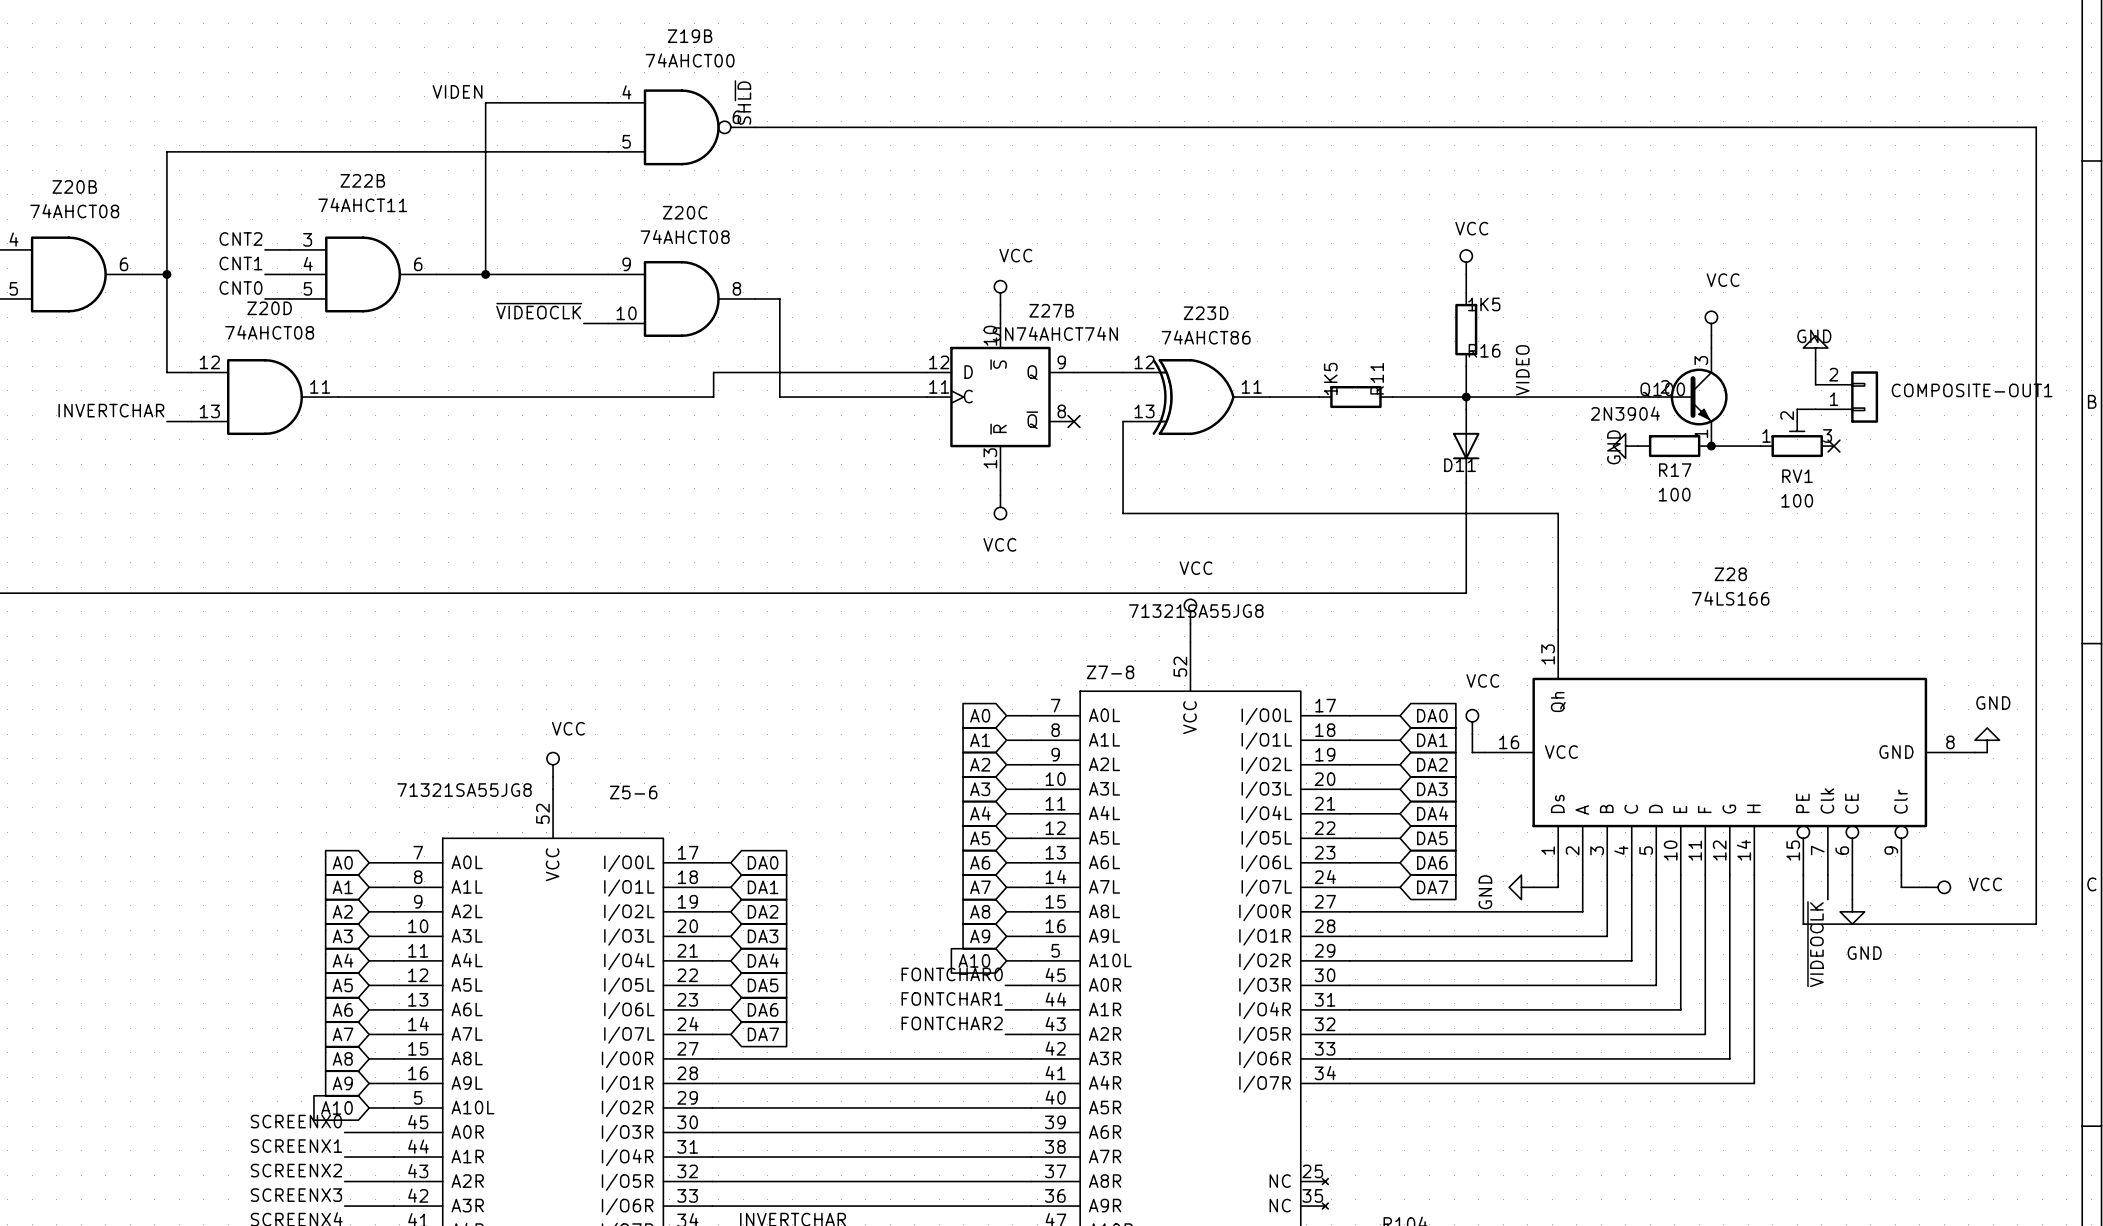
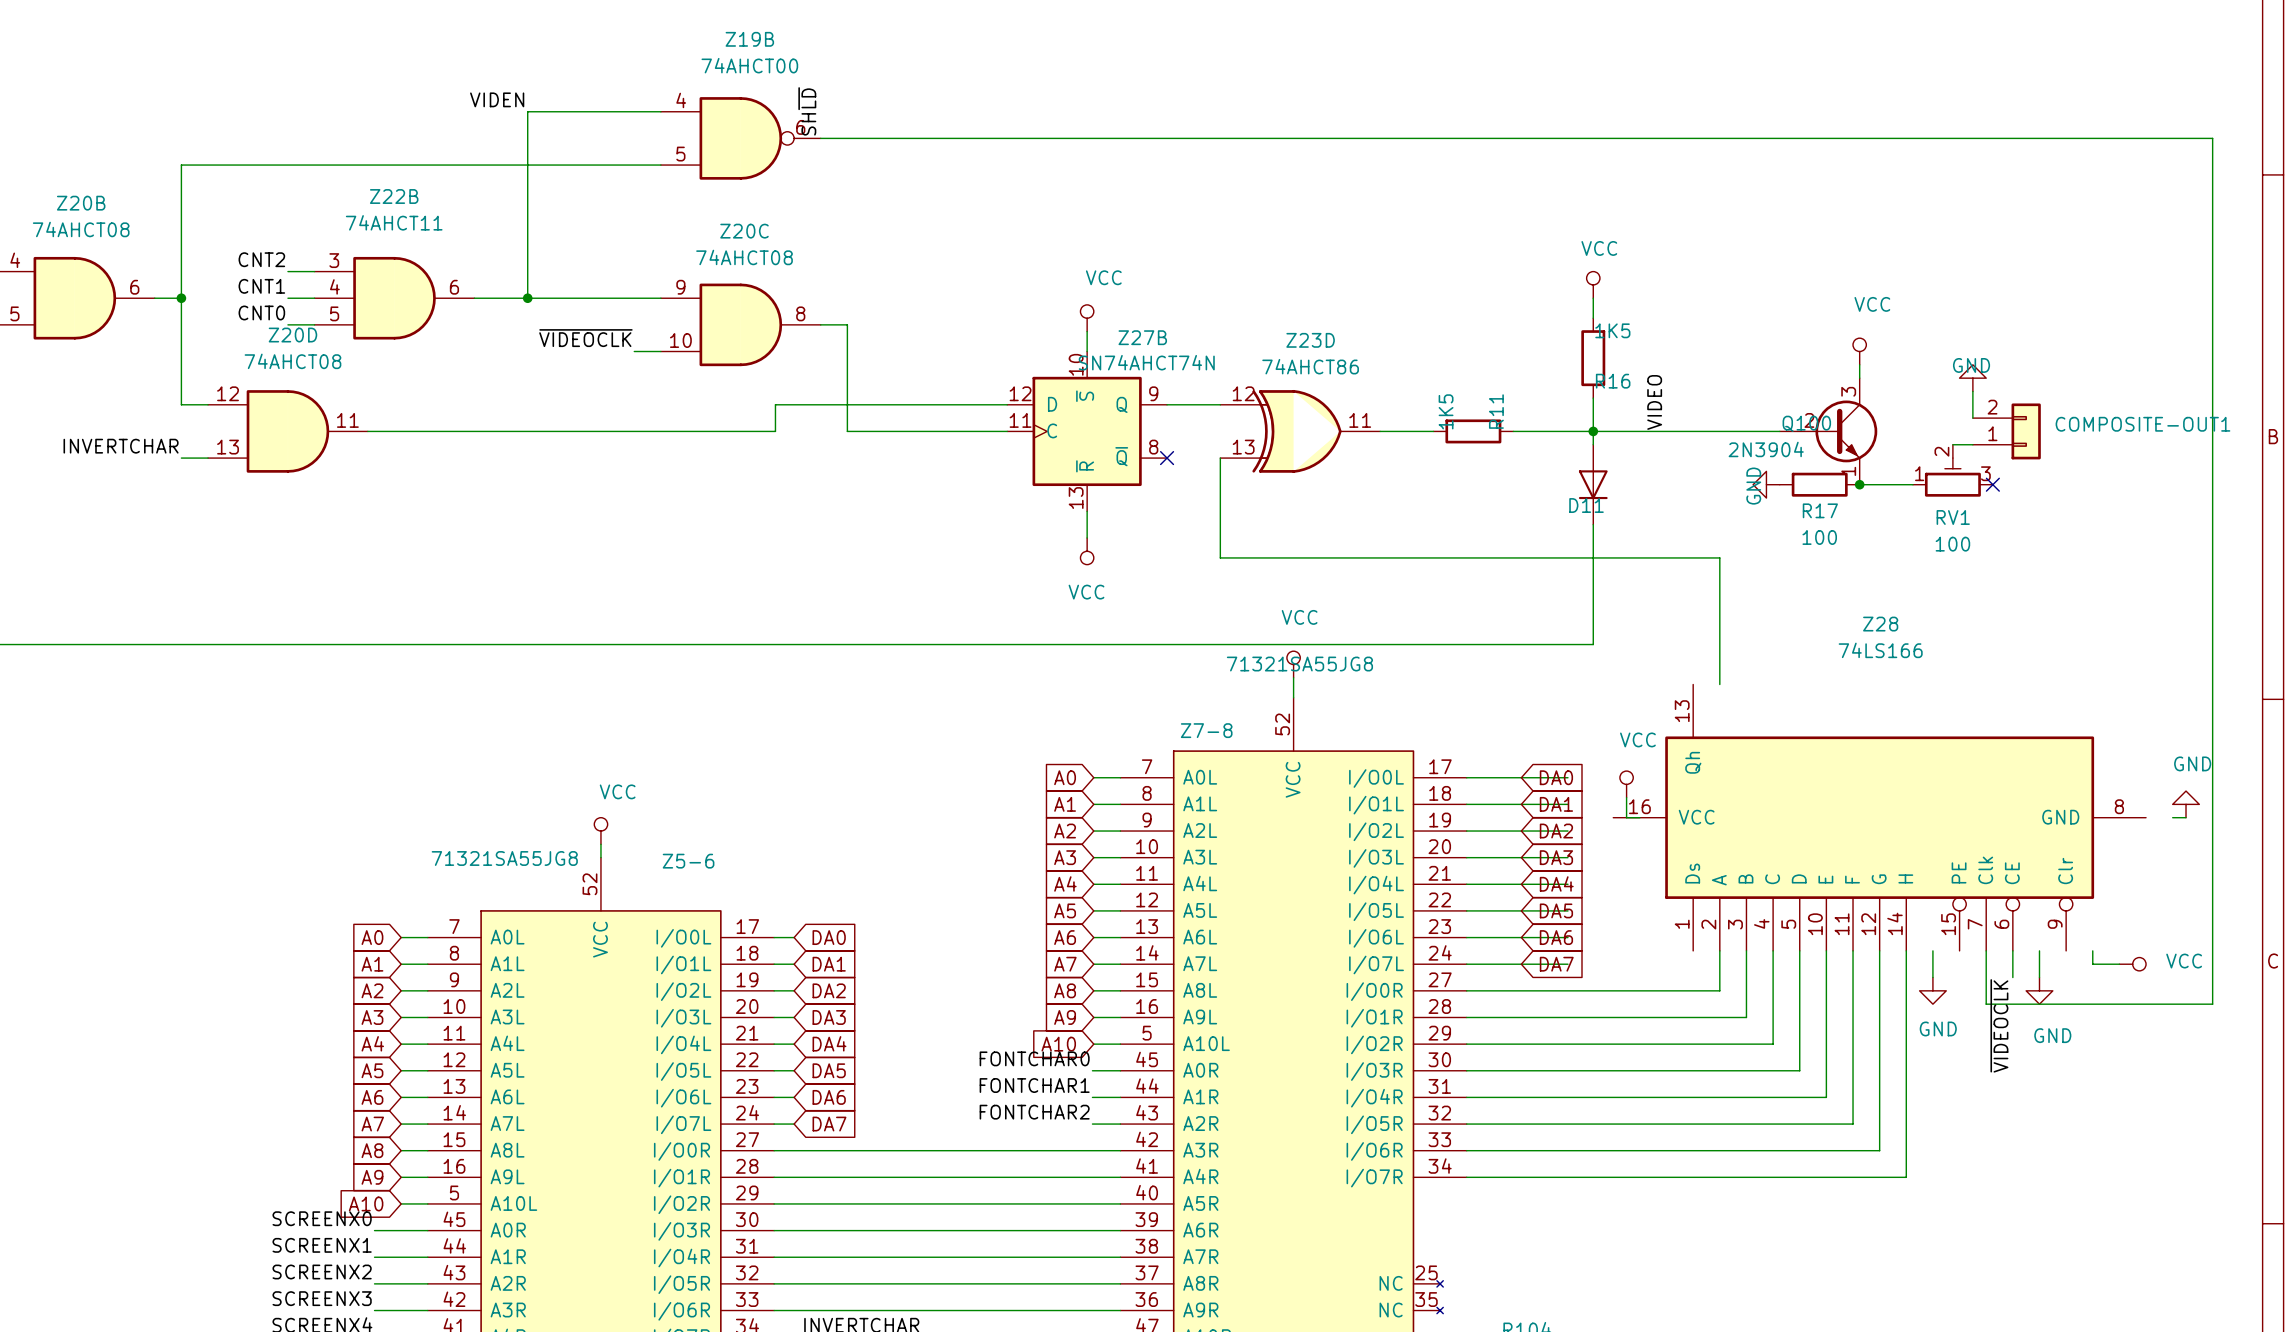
wire: (1558, 513) (1558, 629) -> (1693, 557) (1719, 557) (1719, 684)
wire: none -> (1521, 777) (1567, 777)
power symbol position: VCC (1472, 721) -> VCC (1626, 784)
wire: (1472, 734) (1472, 752) (1484, 752) -> (1626, 797) (1626, 817) (1639, 817)
wire: none -> (1521, 804) (1567, 804)
power symbol position: GND (1987, 740) -> GND (2186, 804)
wire: (1974, 752) (1987, 752) -> (2172, 817) (2186, 817)
wire: none -> (1521, 831) (1567, 831)
wire: none -> (1521, 857) (1567, 857)
wire: none -> (1521, 884) (1567, 884)
wire: none -> (1521, 910) (1567, 910)
wire: none -> (1521, 937) (1567, 937)
wire: (1558, 875) (1558, 887) (1533, 887) -> none
wire: none -> (1932, 950) (1932, 977)
wire: (1803, 875) (1803, 924) (1827, 924) -> (1986, 977) (1986, 1004)
wire: none -> (2039, 950) (2039, 977)
wire: (1901, 875) (1901, 887) (1925, 887) -> (2092, 950) (2092, 964) (2119, 964)
wire: none -> (1521, 964) (1567, 964)
power symbol: GND (1521, 887) -> none
power symbol position: VCC (1938, 887) -> VCC (2132, 964)
power symbol: none -> GND (1932, 990)
power symbol position: GND (1852, 911) -> GND (2039, 990)
label position: ~{VIDEOCLK} (1815, 944) -> ~{VIDEOCLK} (1999, 1025)

